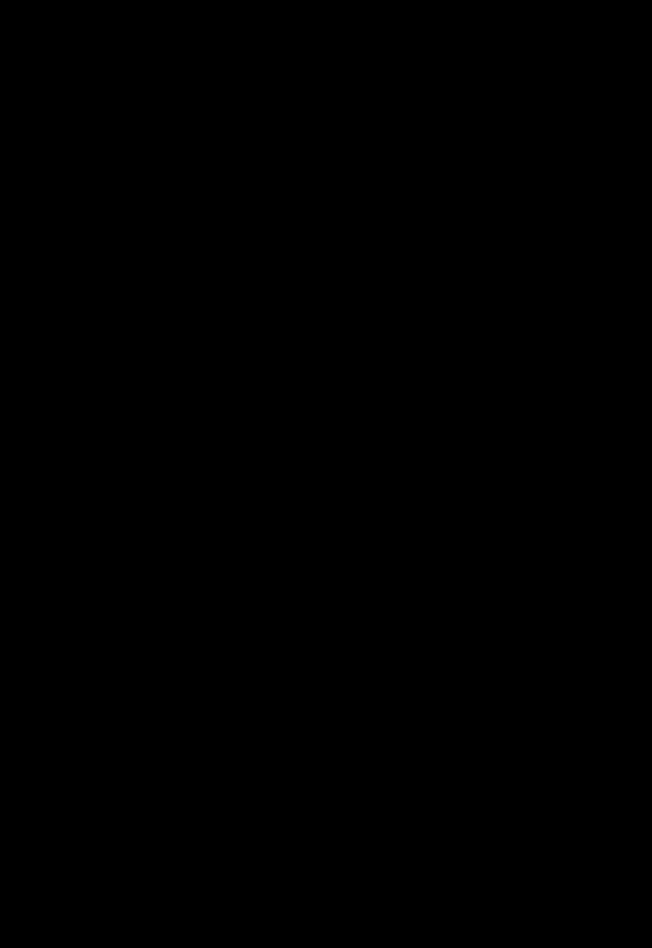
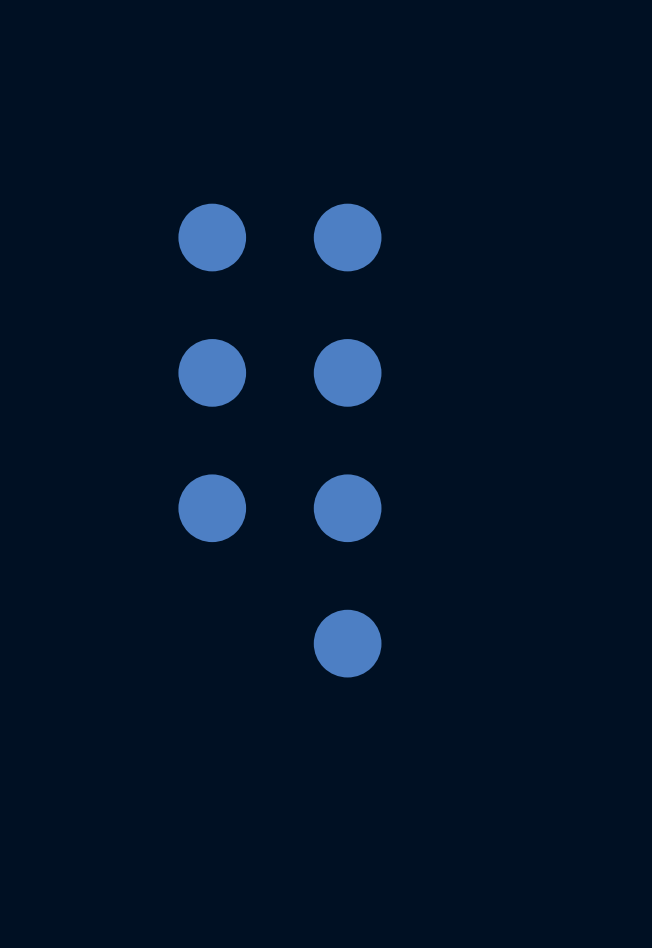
part: none -> (212, 237)
part: none -> (347, 237)
part: none -> (212, 372)
part: none -> (347, 372)
part: none -> (212, 508)
part: none -> (347, 508)
part: none -> (347, 643)

